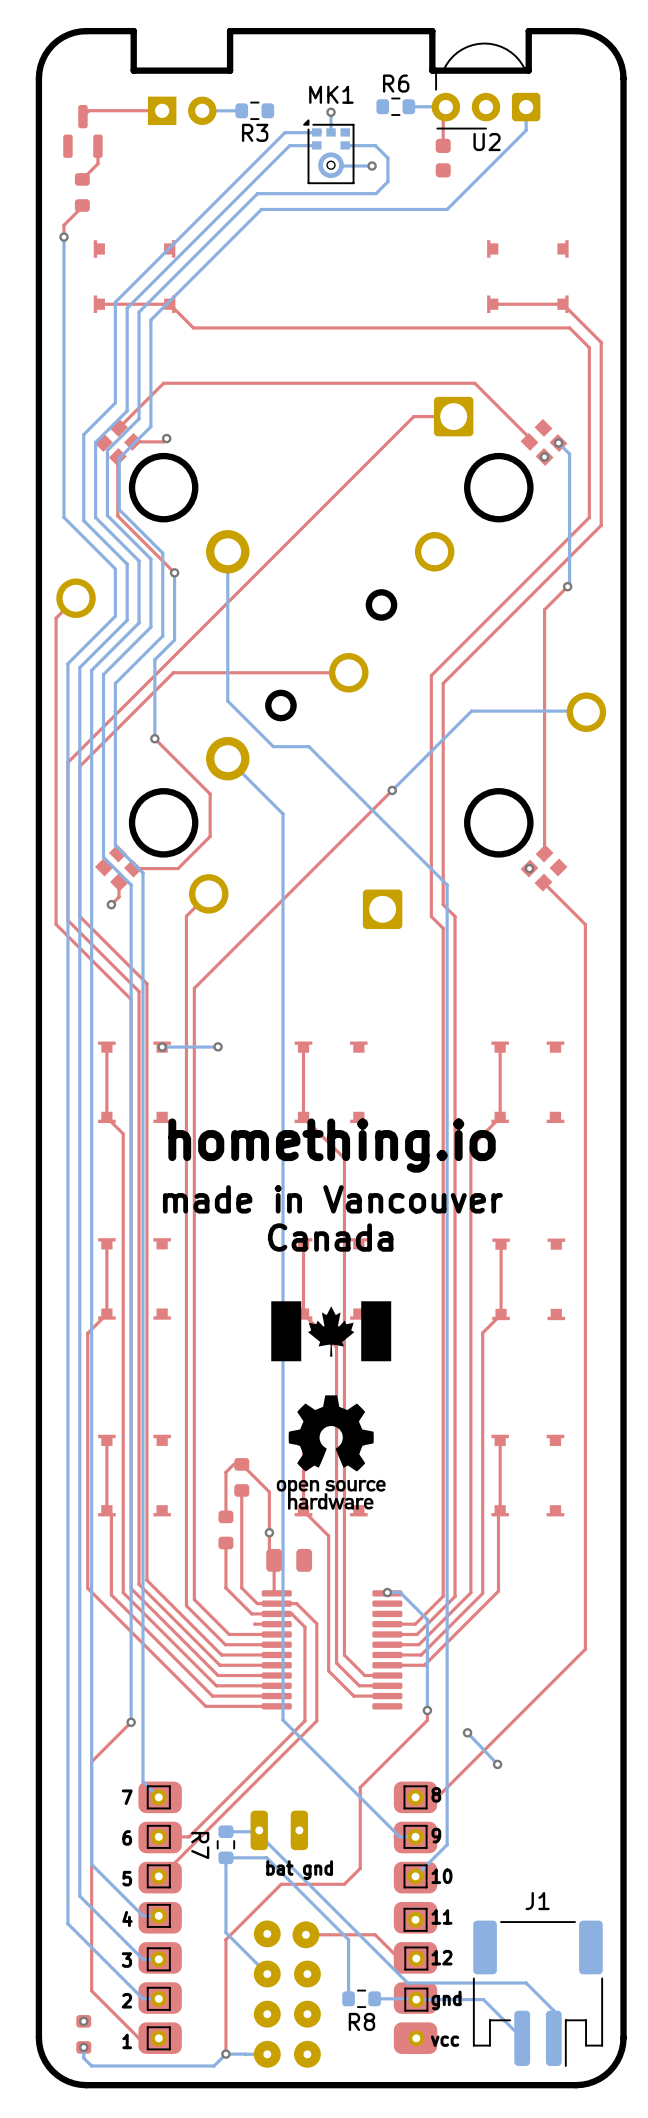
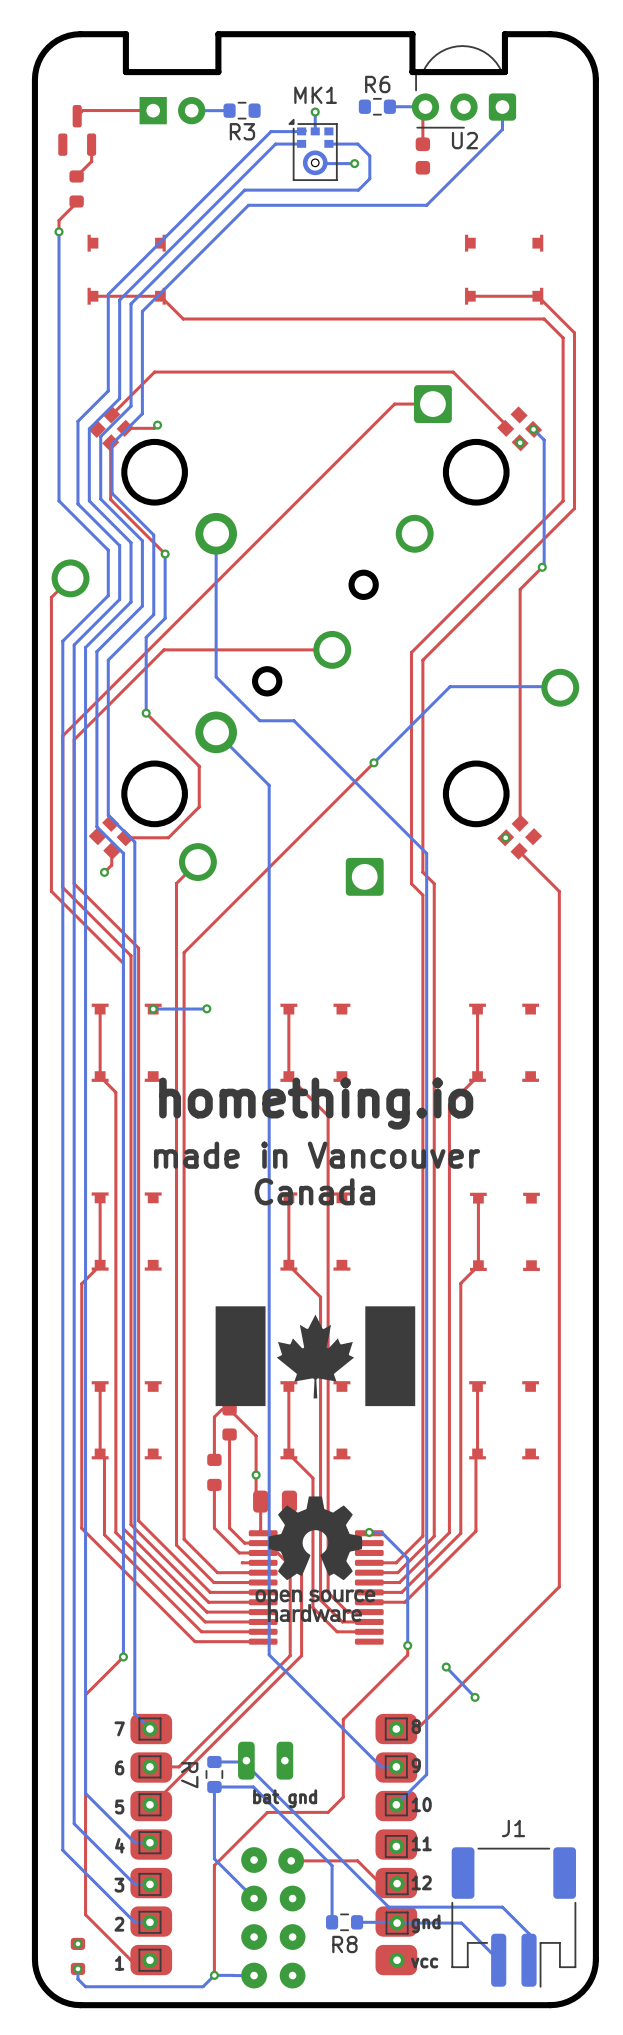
drawing: [271, 1301, 392, 1362] -> none
drawing: none -> [215, 1306, 416, 1407]
drawing: [276, 1395, 386, 1510] -> none
drawing: none -> [255, 1496, 376, 1623]

